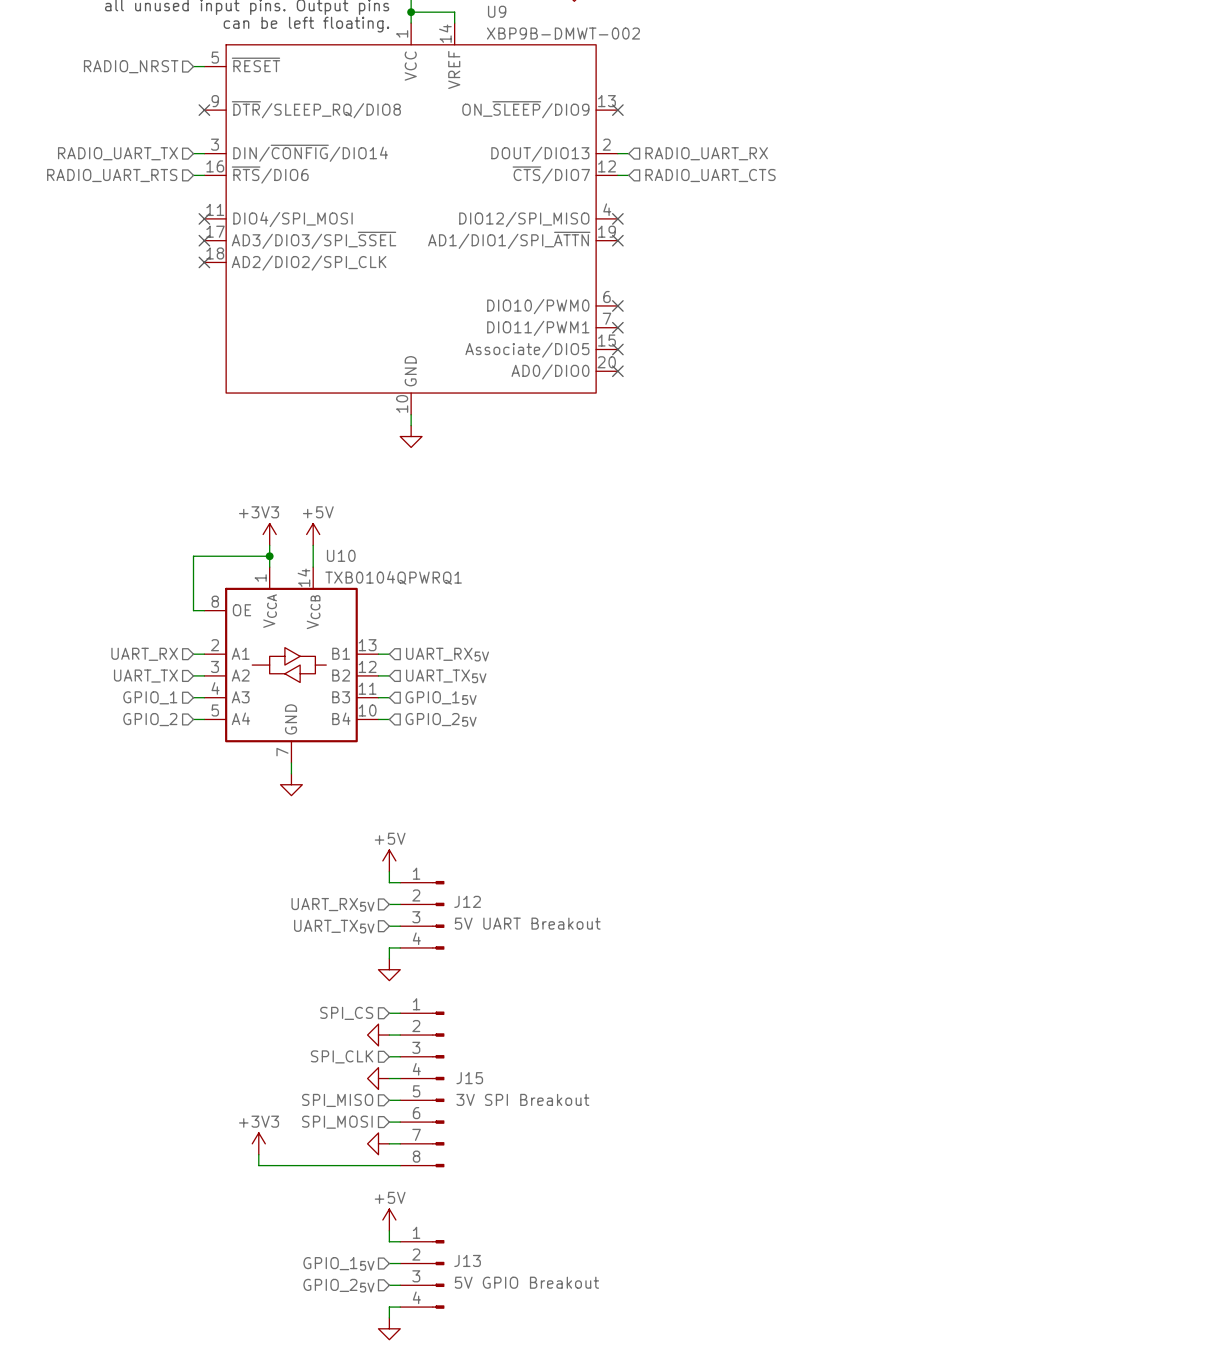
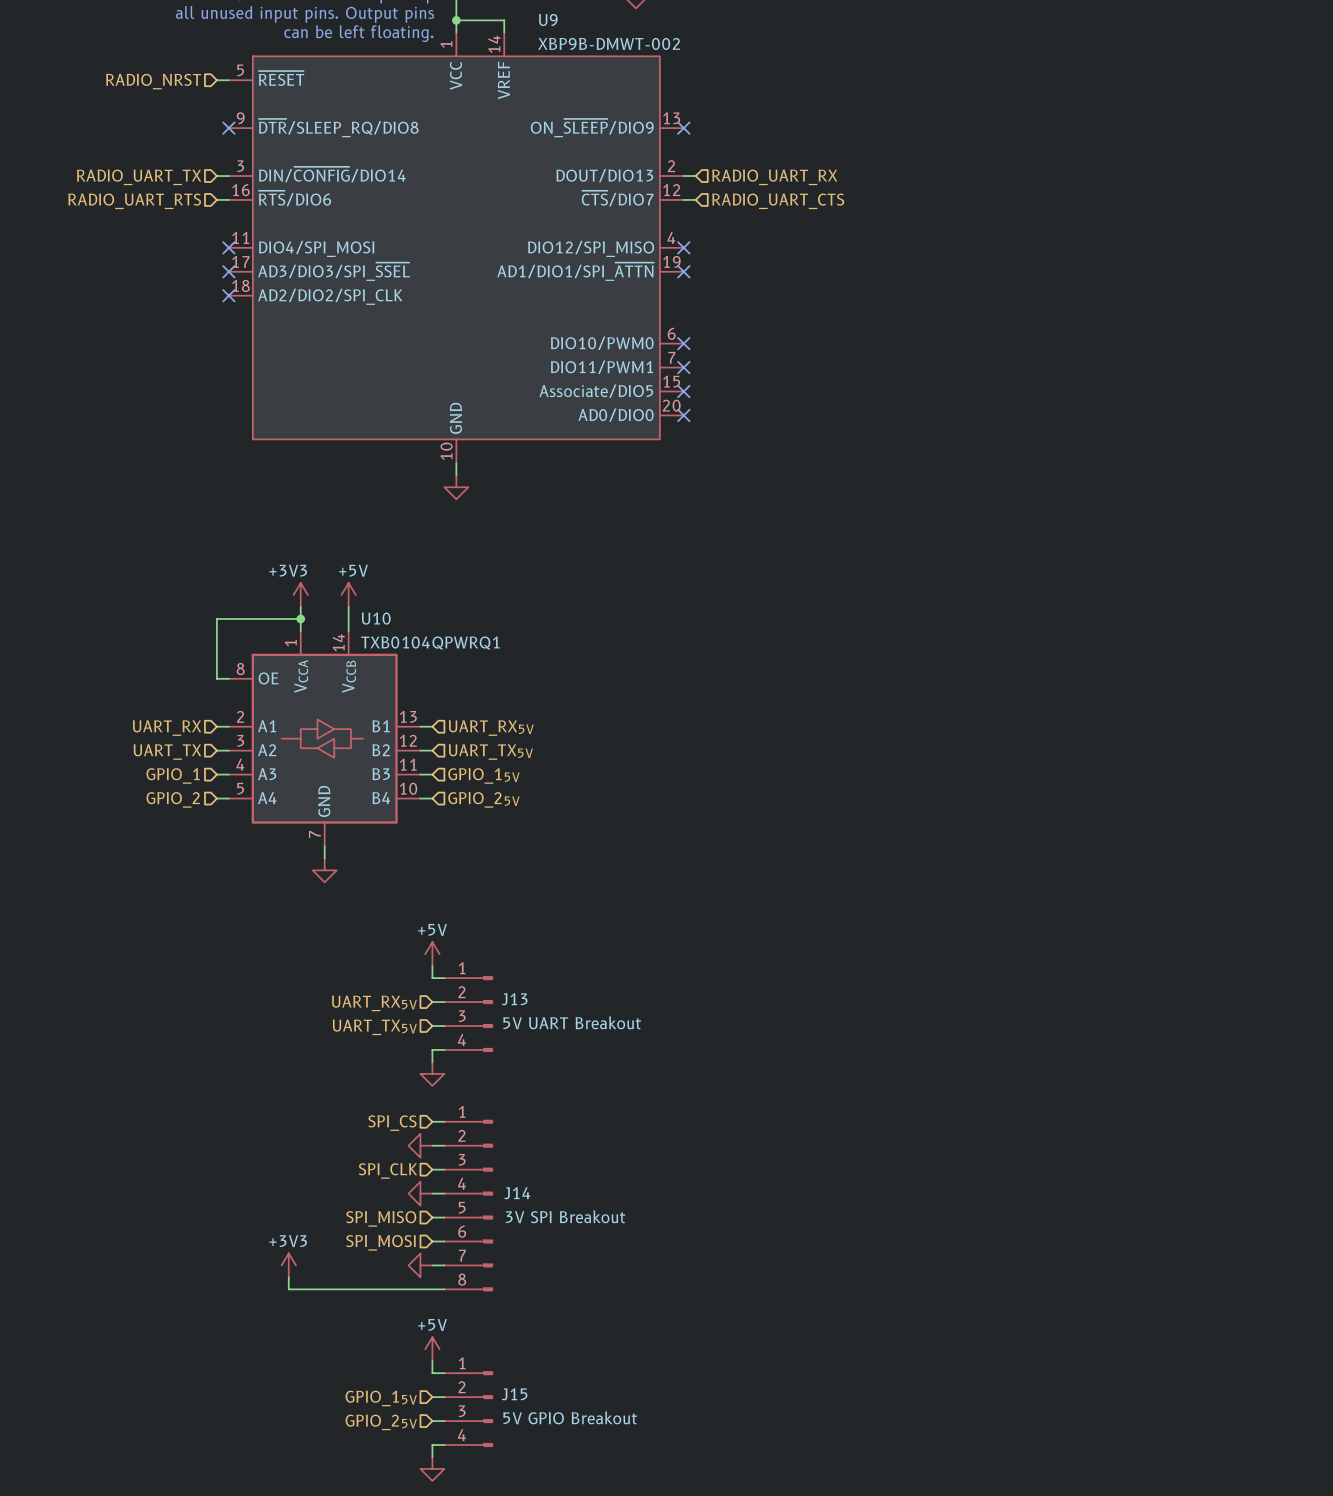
J12 name: J12 (467, 901) -> J13 (514, 999)
J15 name: J15 (469, 1078) -> J14 (517, 1193)
J13 name: J13 (467, 1260) -> J15 (514, 1394)

